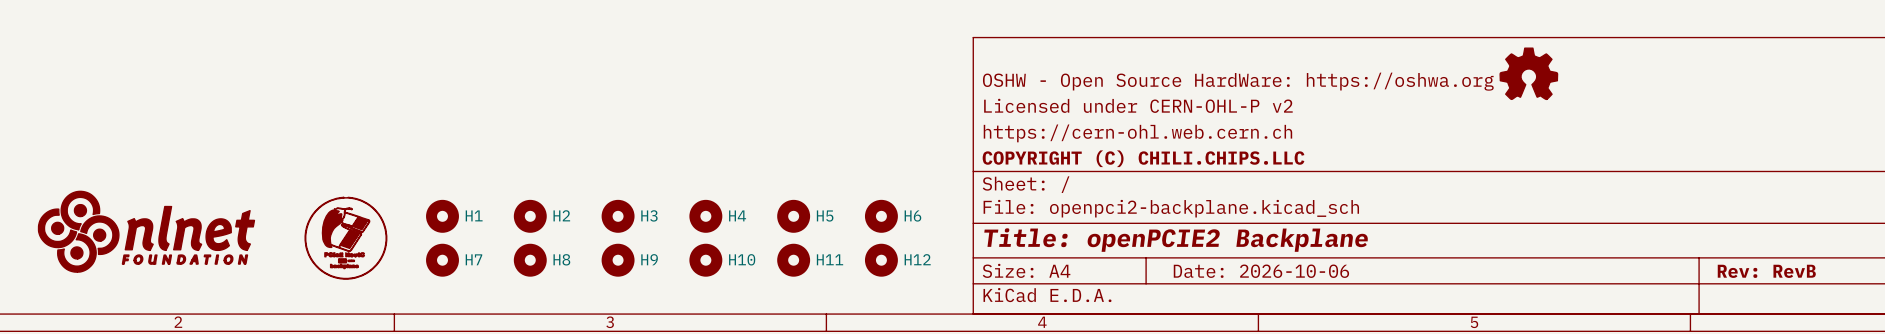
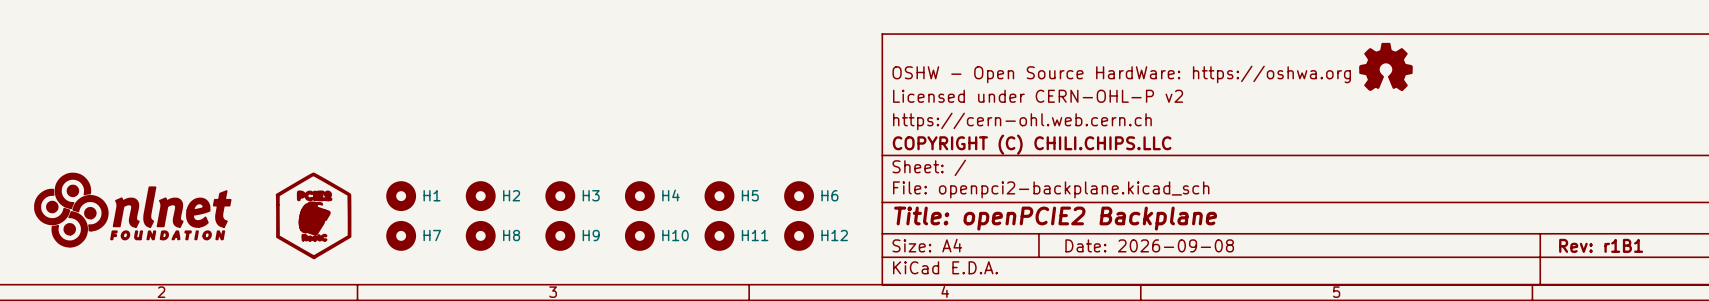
part symbol: [305, 197, 387, 280] -> [276, 173, 351, 259]
title block: Date: 2026-10-06 (1261, 271) -> Date: 2026-09-08 (1149, 245)
title block: Rev: RevB (1766, 271) -> Rev: r1B1 (1601, 245)

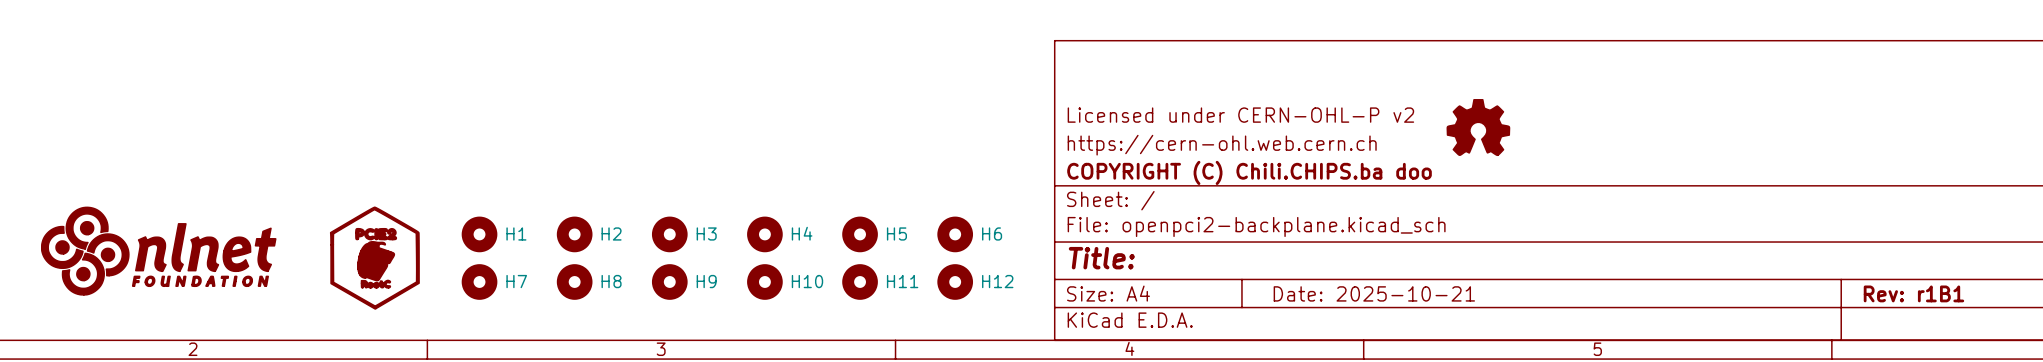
part position: (1385, 66) -> (1478, 127)
title block: OSHW - Open Source HardWare: https://oshwa.org (1121, 74) -> none
title block: COPYRIGHT (C) CHILI.CHIPS.LLC (1032, 144) -> COPYRIGHT (C) Chili.CHIPS.ba doo (1249, 172)
title block: Title: openPCIE2 Backplane (1055, 218) -> Title: (1101, 258)
title block: Date: 2026-09-08 (1149, 245) -> Date: 2025-10-21 (1374, 293)

